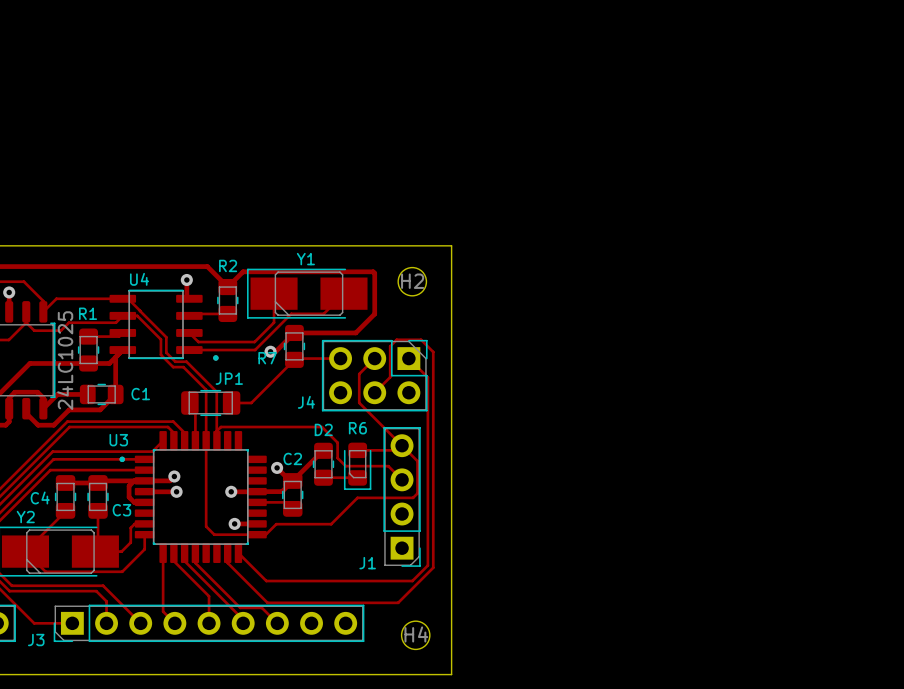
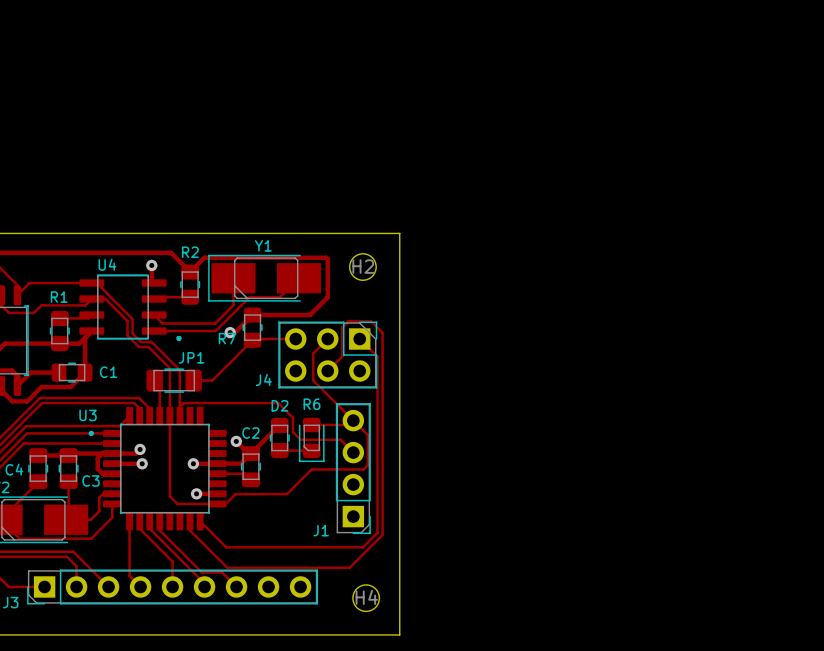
part value: 24LC1025 (65, 360) -> none

